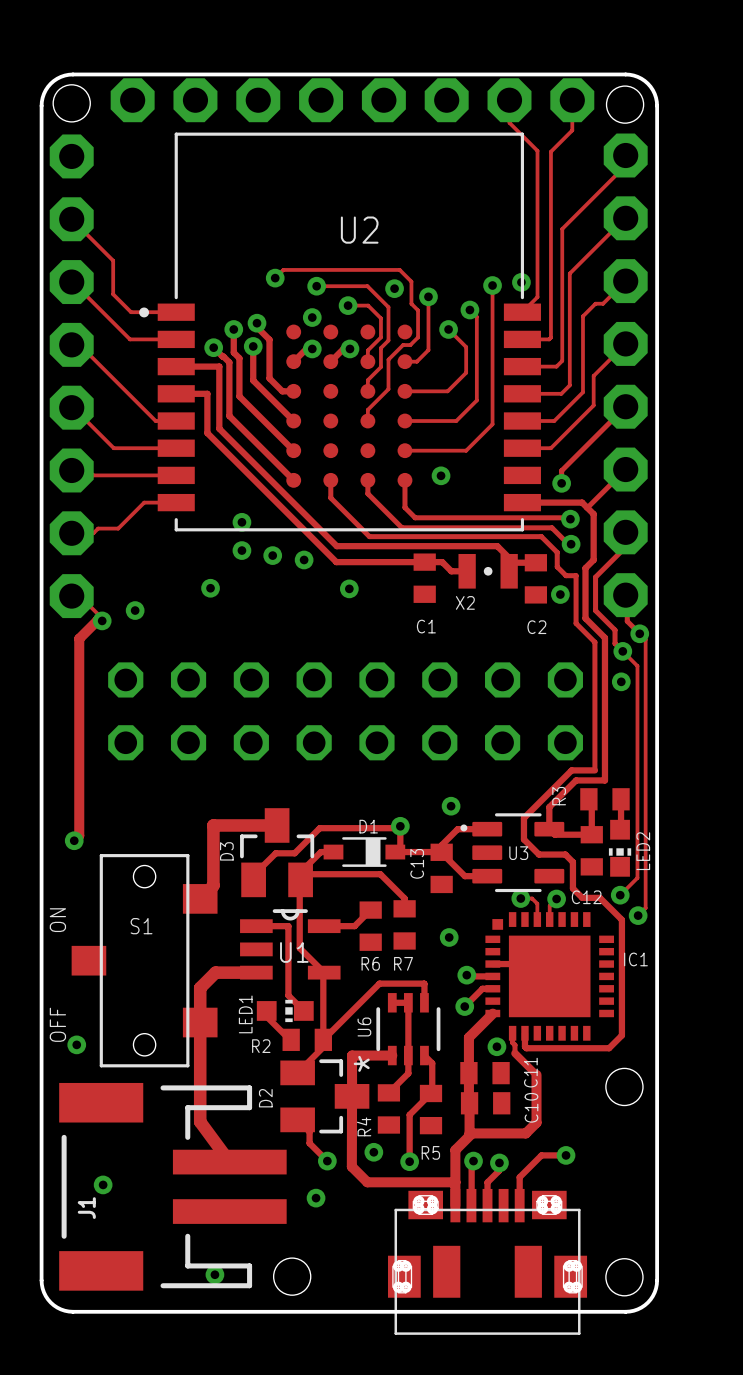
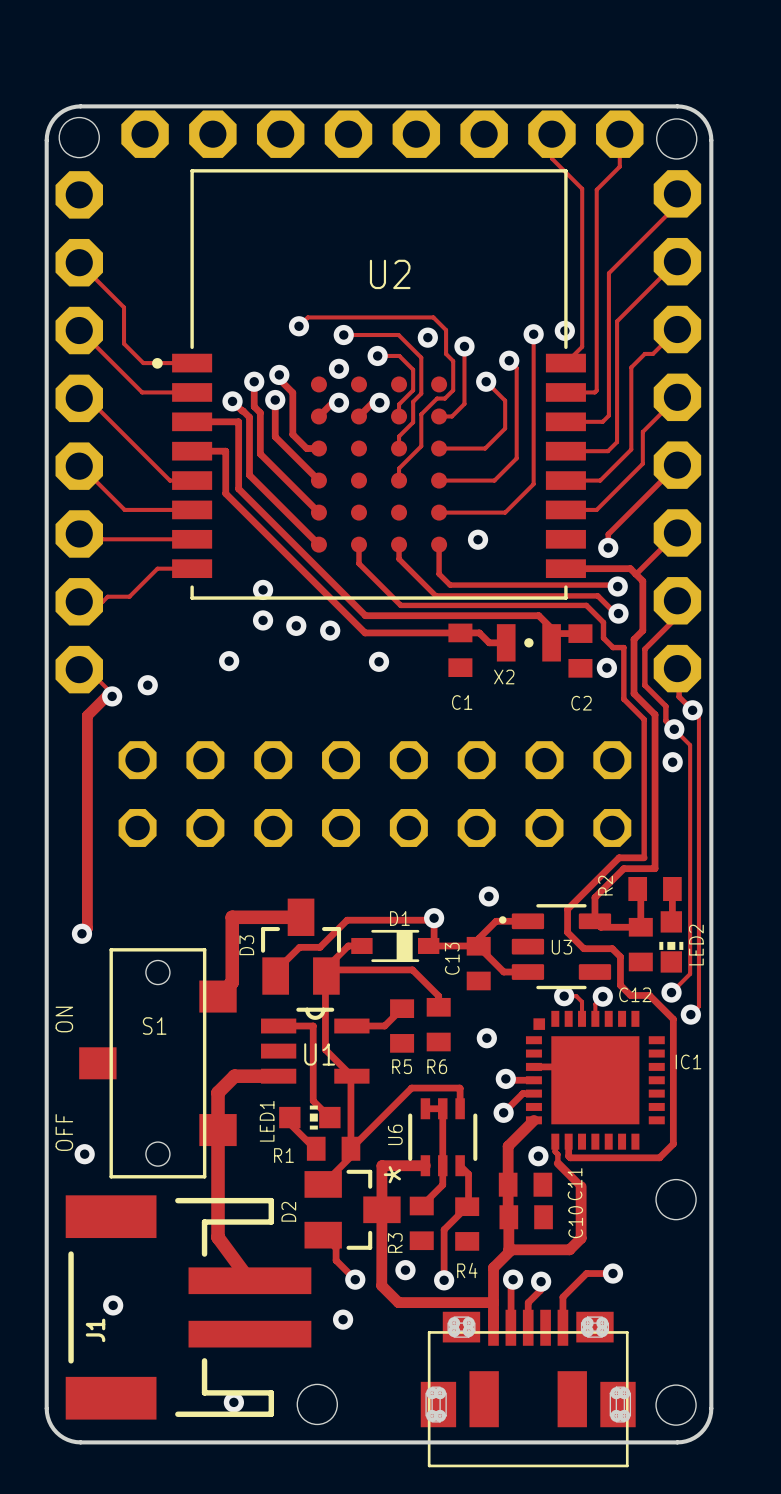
R3 name: R3 (559, 796) -> R2 (605, 885)
R6 name: R6 (370, 963) -> R5 (402, 1066)
R7 name: R7 (403, 963) -> R6 (437, 1066)
R2 name: R2 (261, 1046) -> R1 (283, 1155)
R4 name: R4 (364, 1126) -> R3 (395, 1242)
R5 name: R5 (430, 1152) -> R4 (467, 1270)

